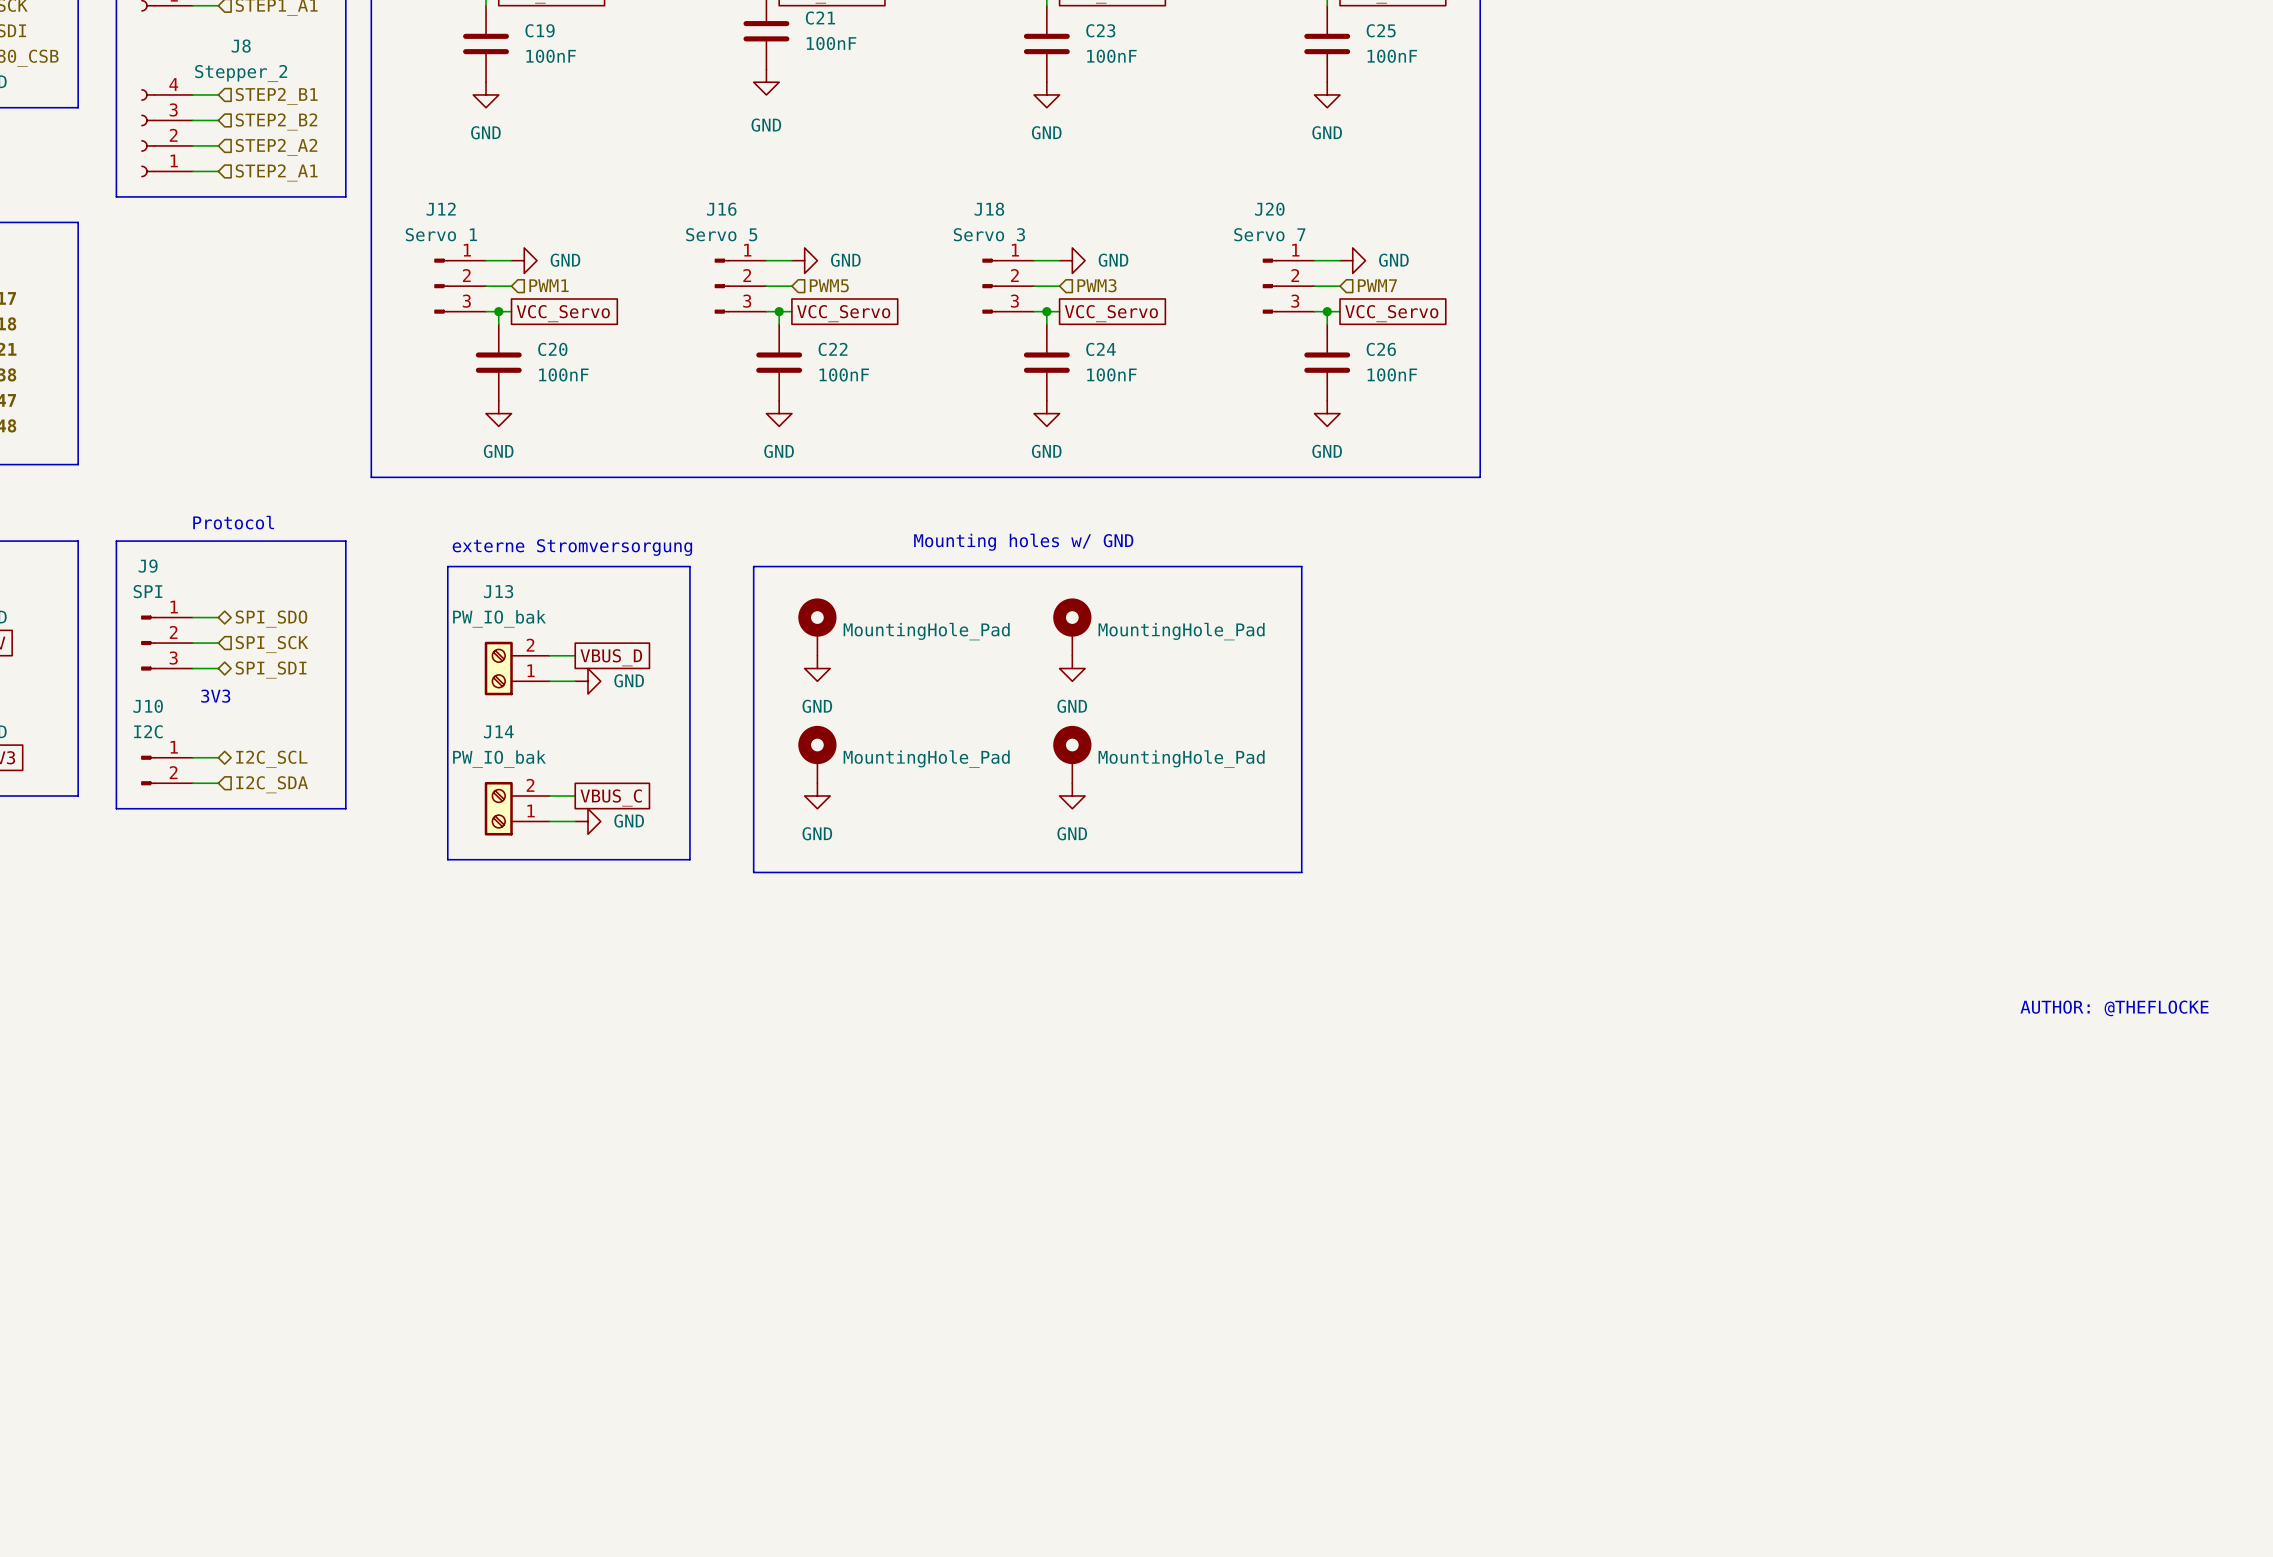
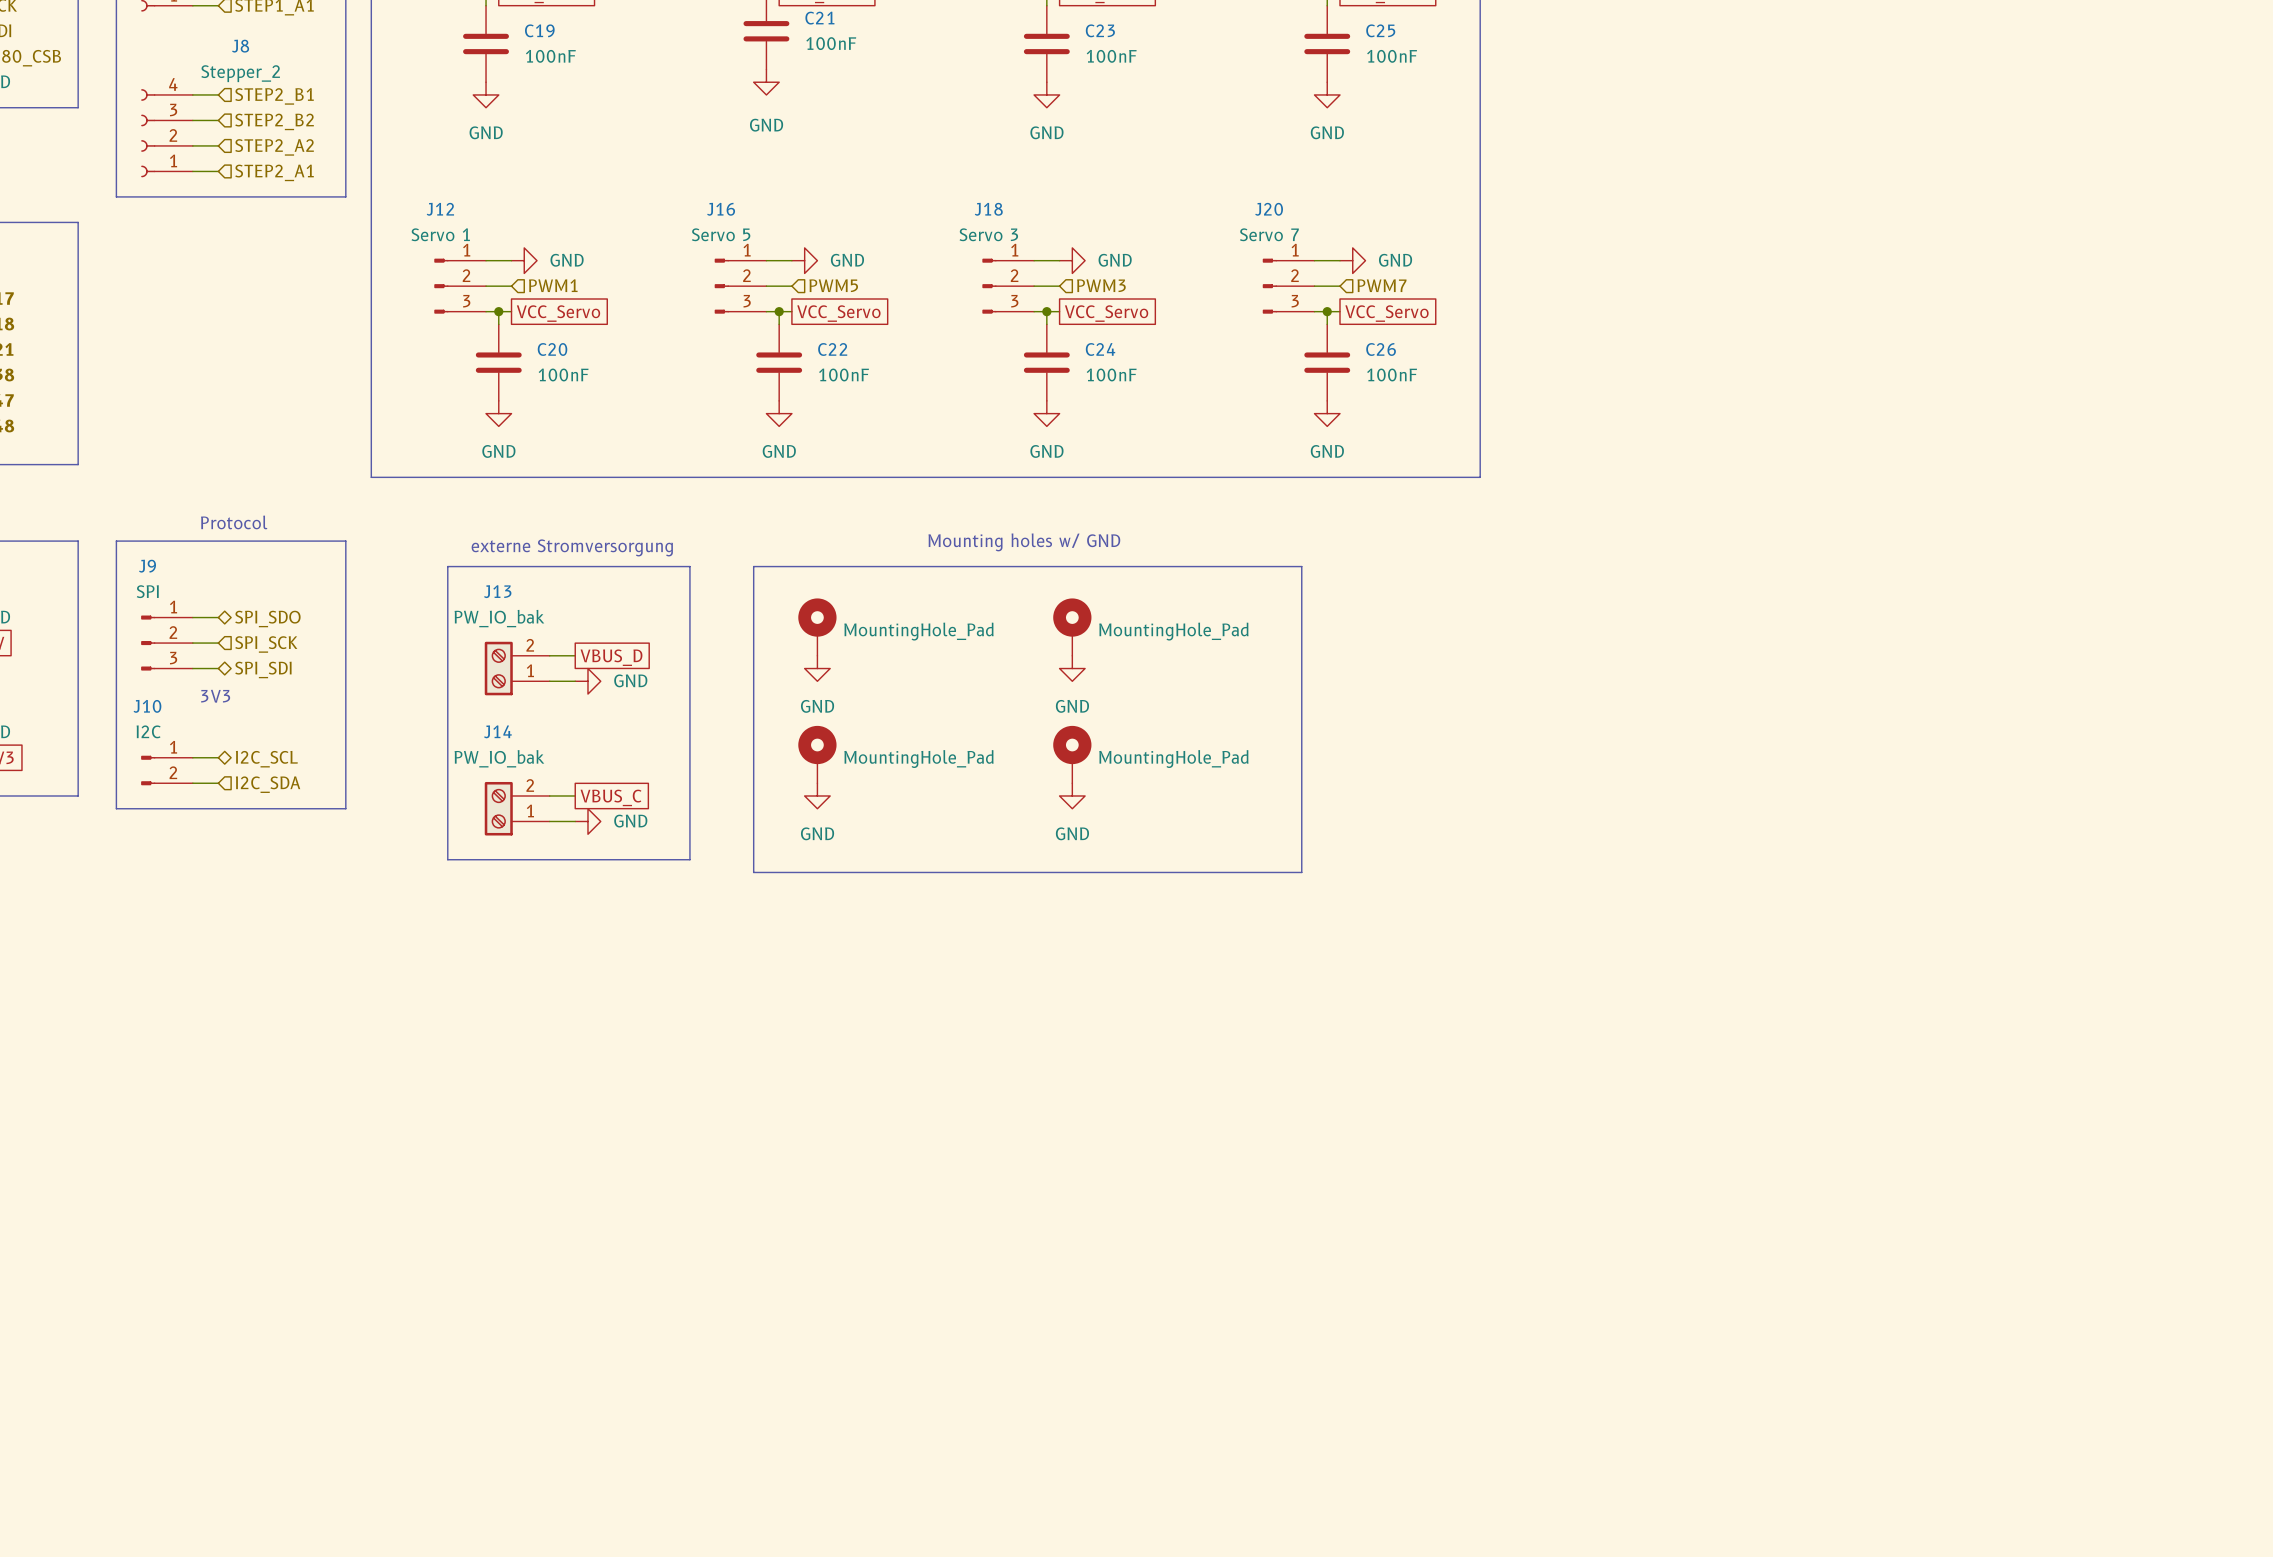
text: AUTHOR: @THEFLOCKE (2114, 1008) -> none

